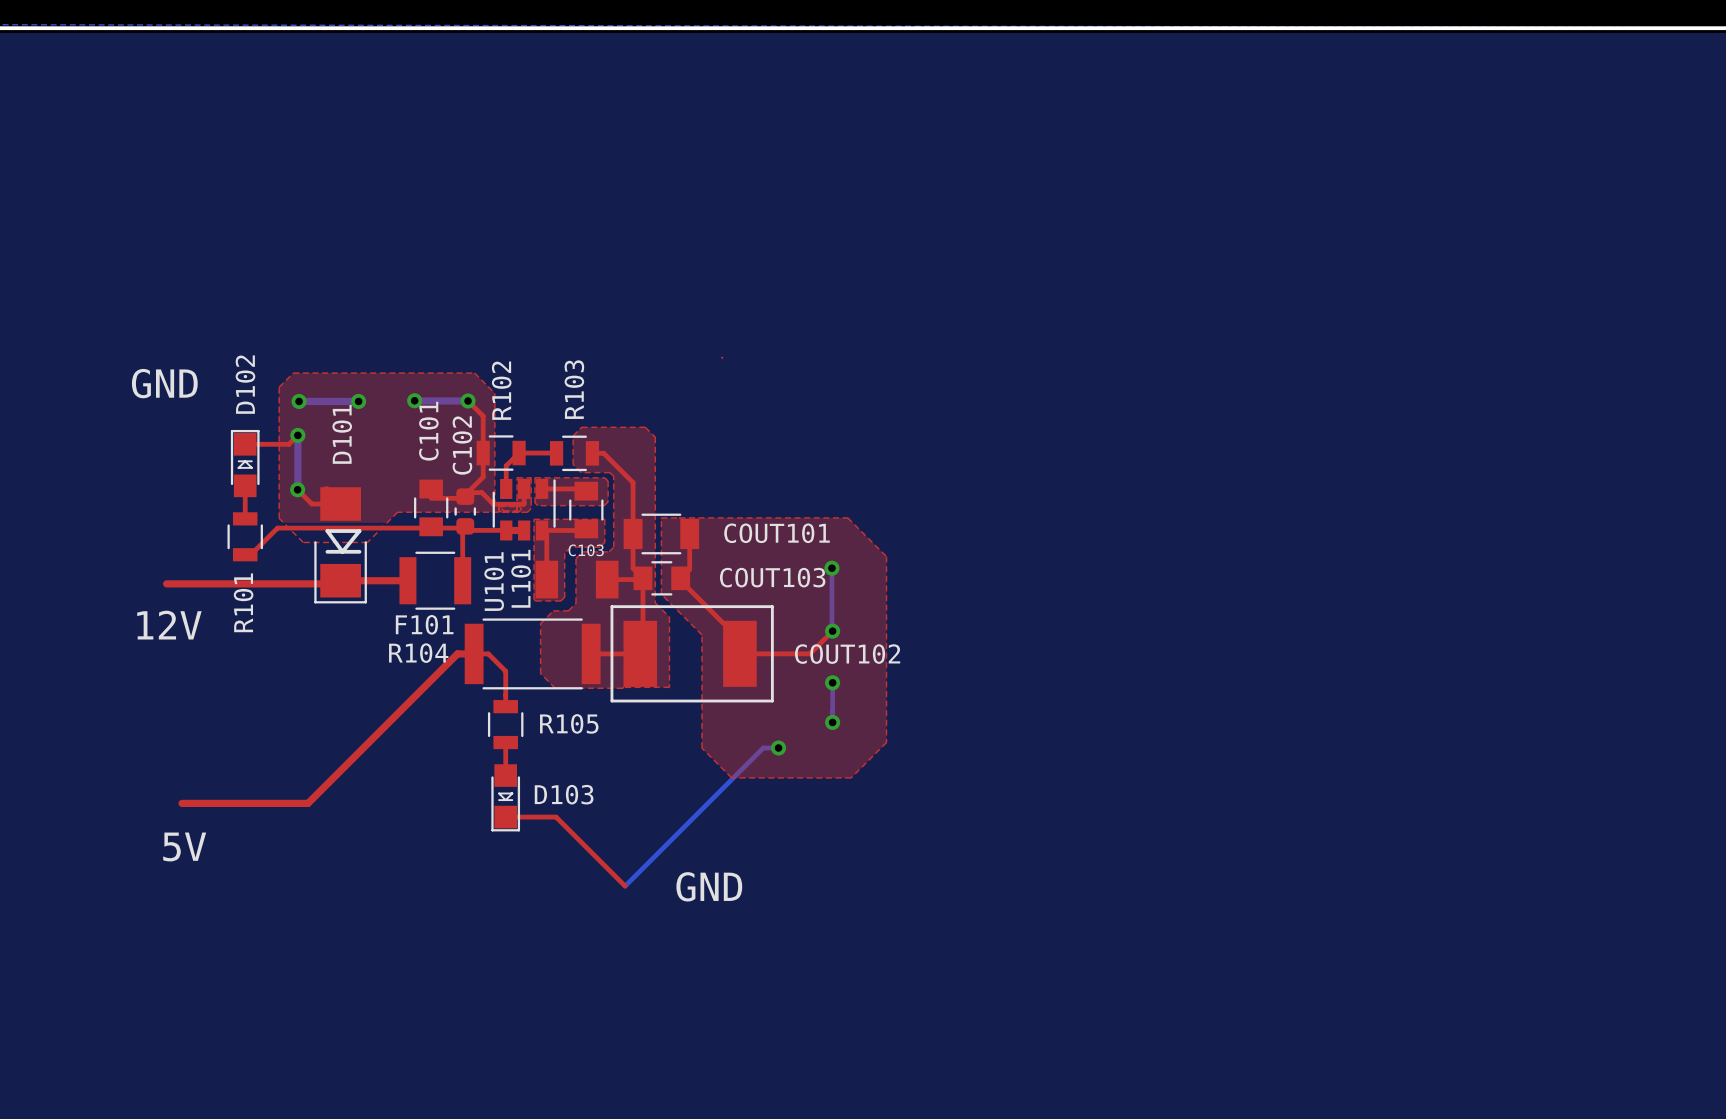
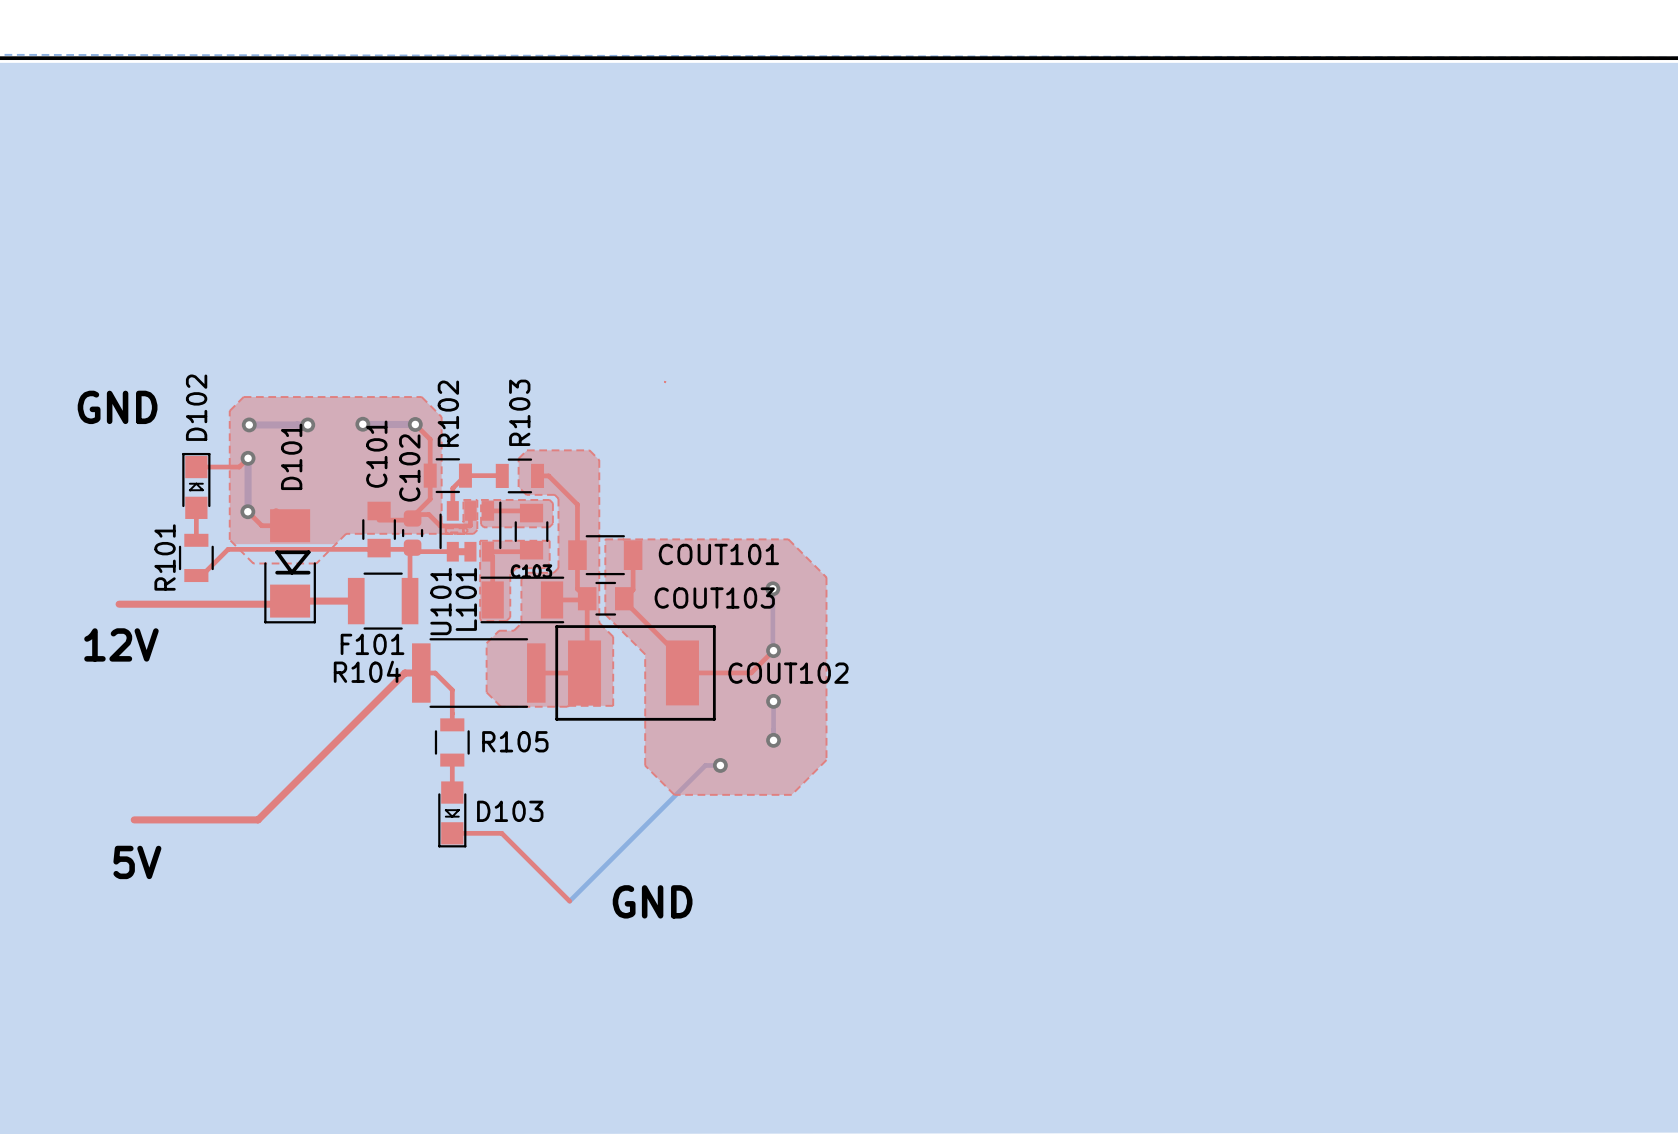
L101 footprint: [535, 560, 619, 599] -> [480, 576, 565, 624]
R101 name position: R101 (243, 602) -> R101 (165, 557)

